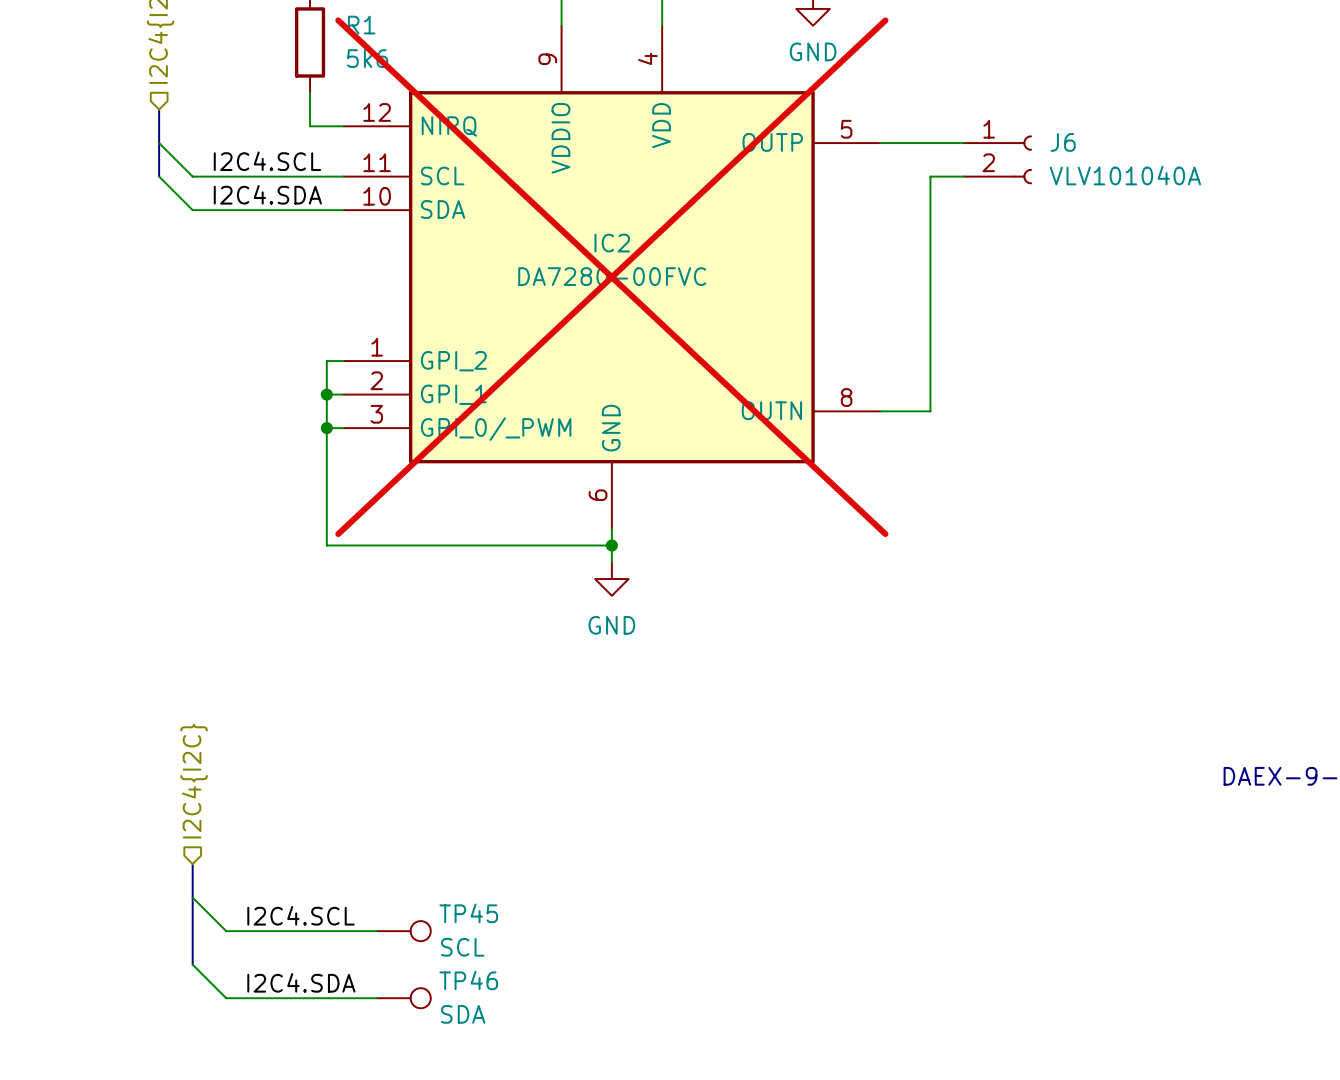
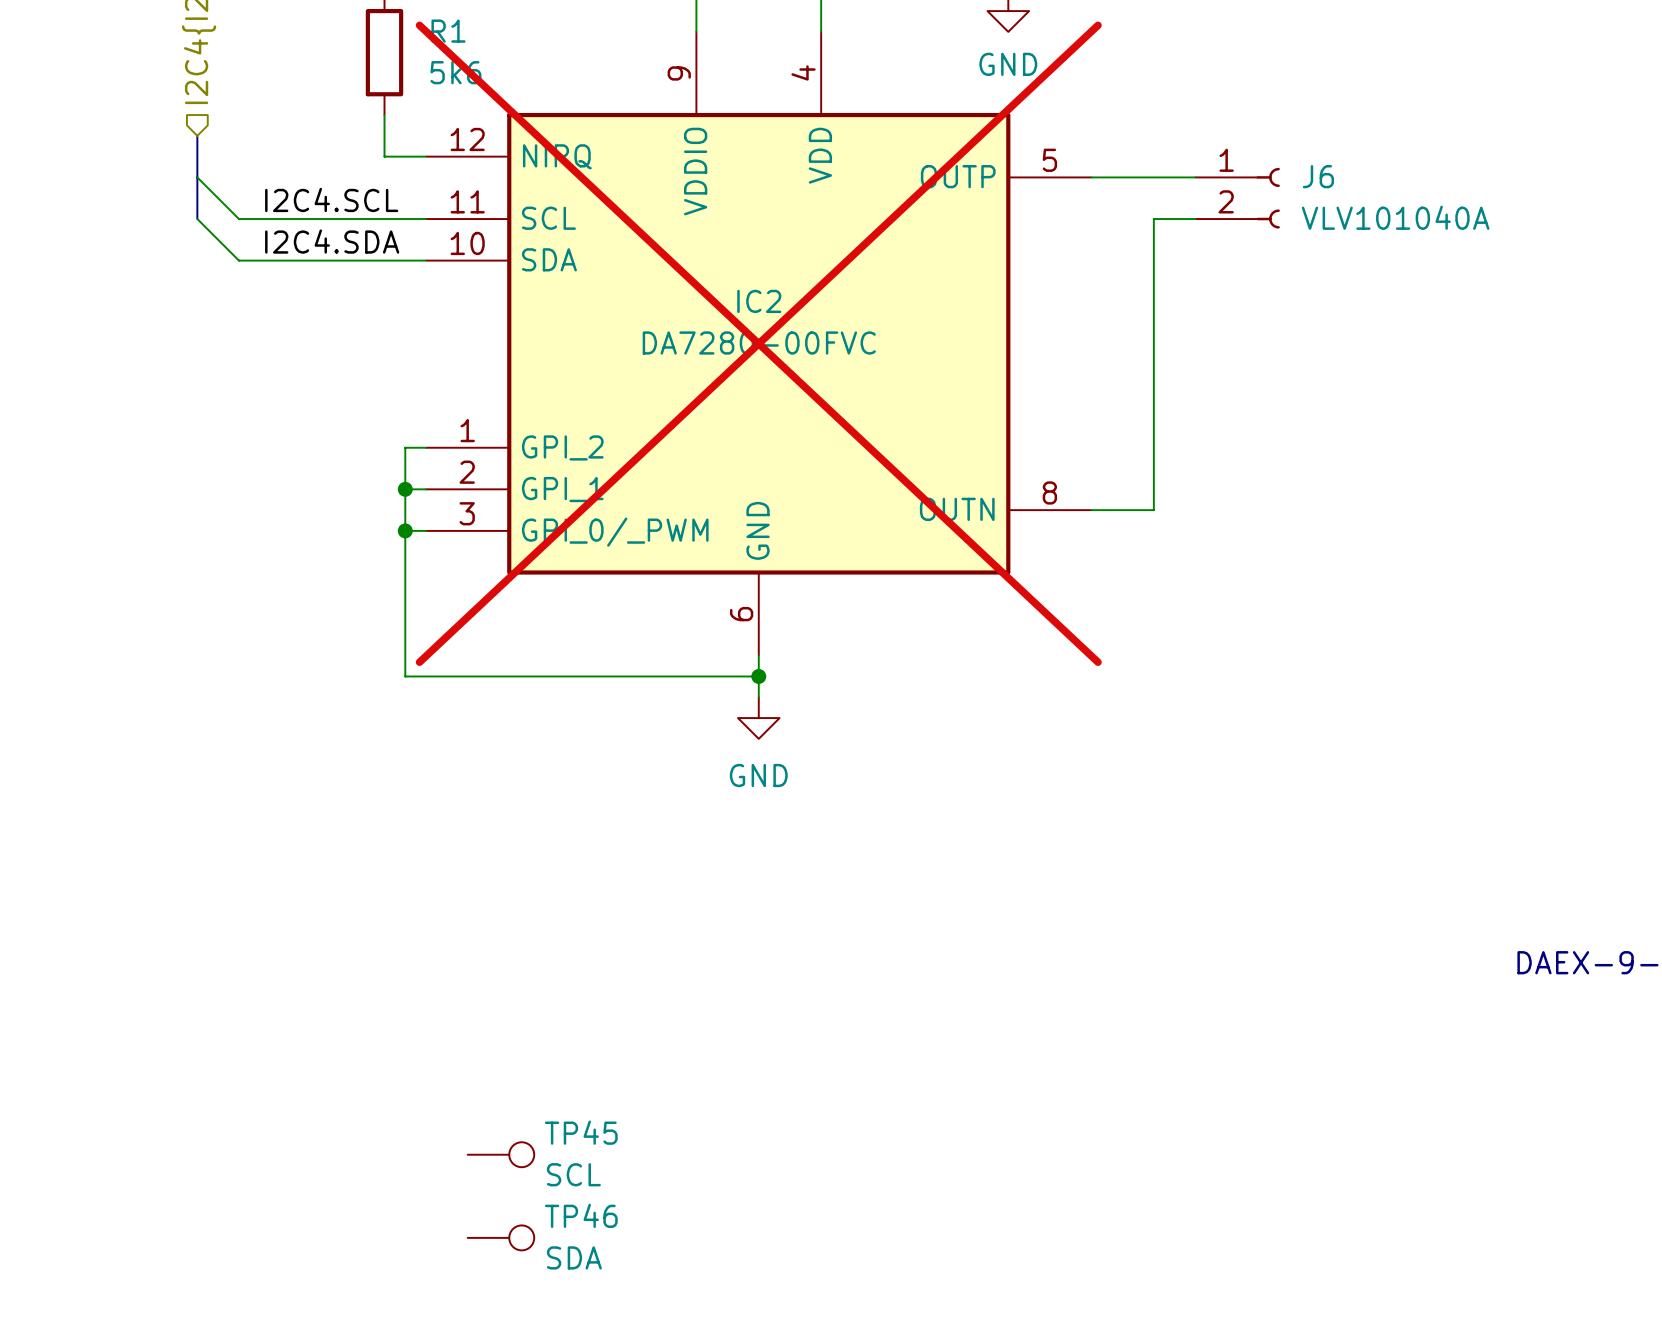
hierarchical label: I2C4{I2C} (194, 781) -> none
bus: (192, 864) (192, 964) -> none
wire: (192, 897) (226, 931) (377, 931) -> none
label: I2C4.SCL (300, 915) -> none
wire: (192, 964) (226, 998) (377, 998) -> none
label: I2C4.SDA (301, 982) -> none

